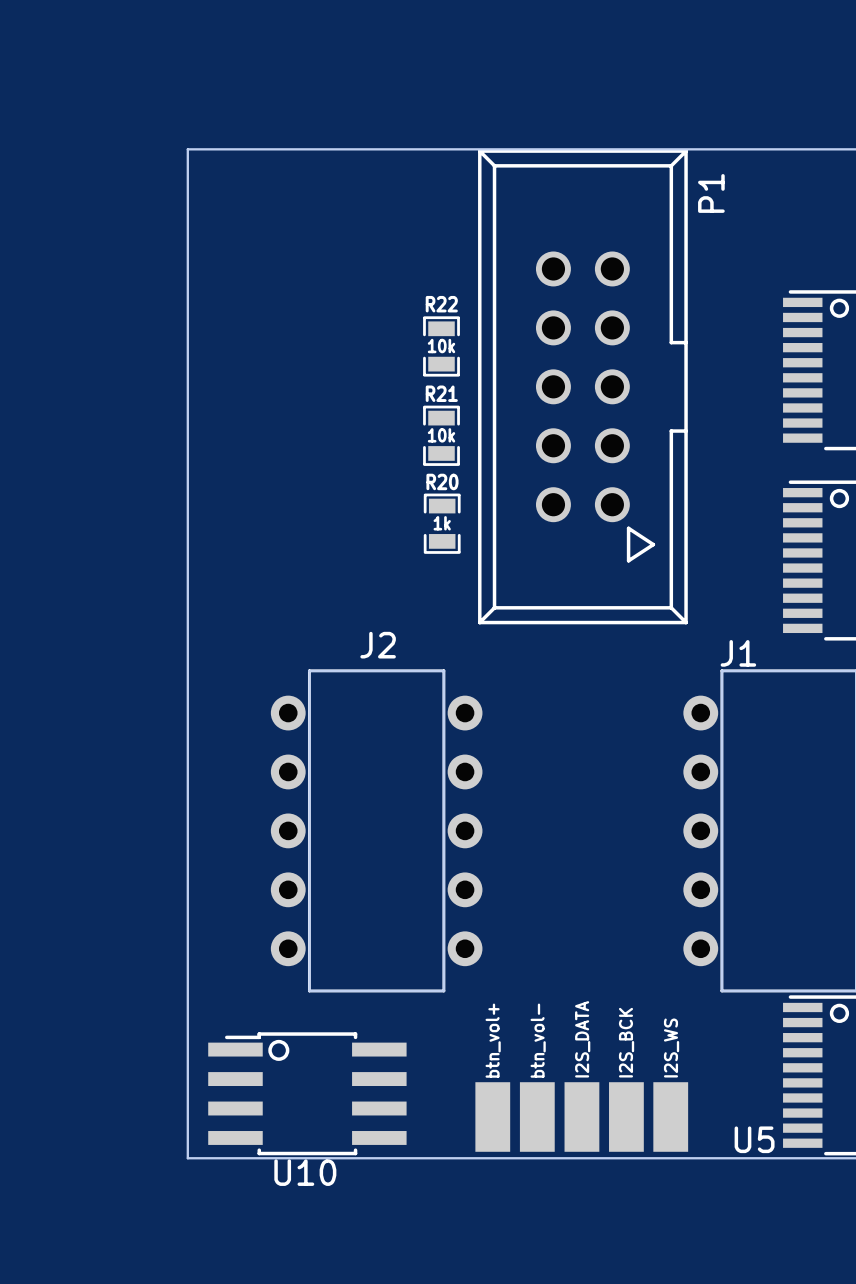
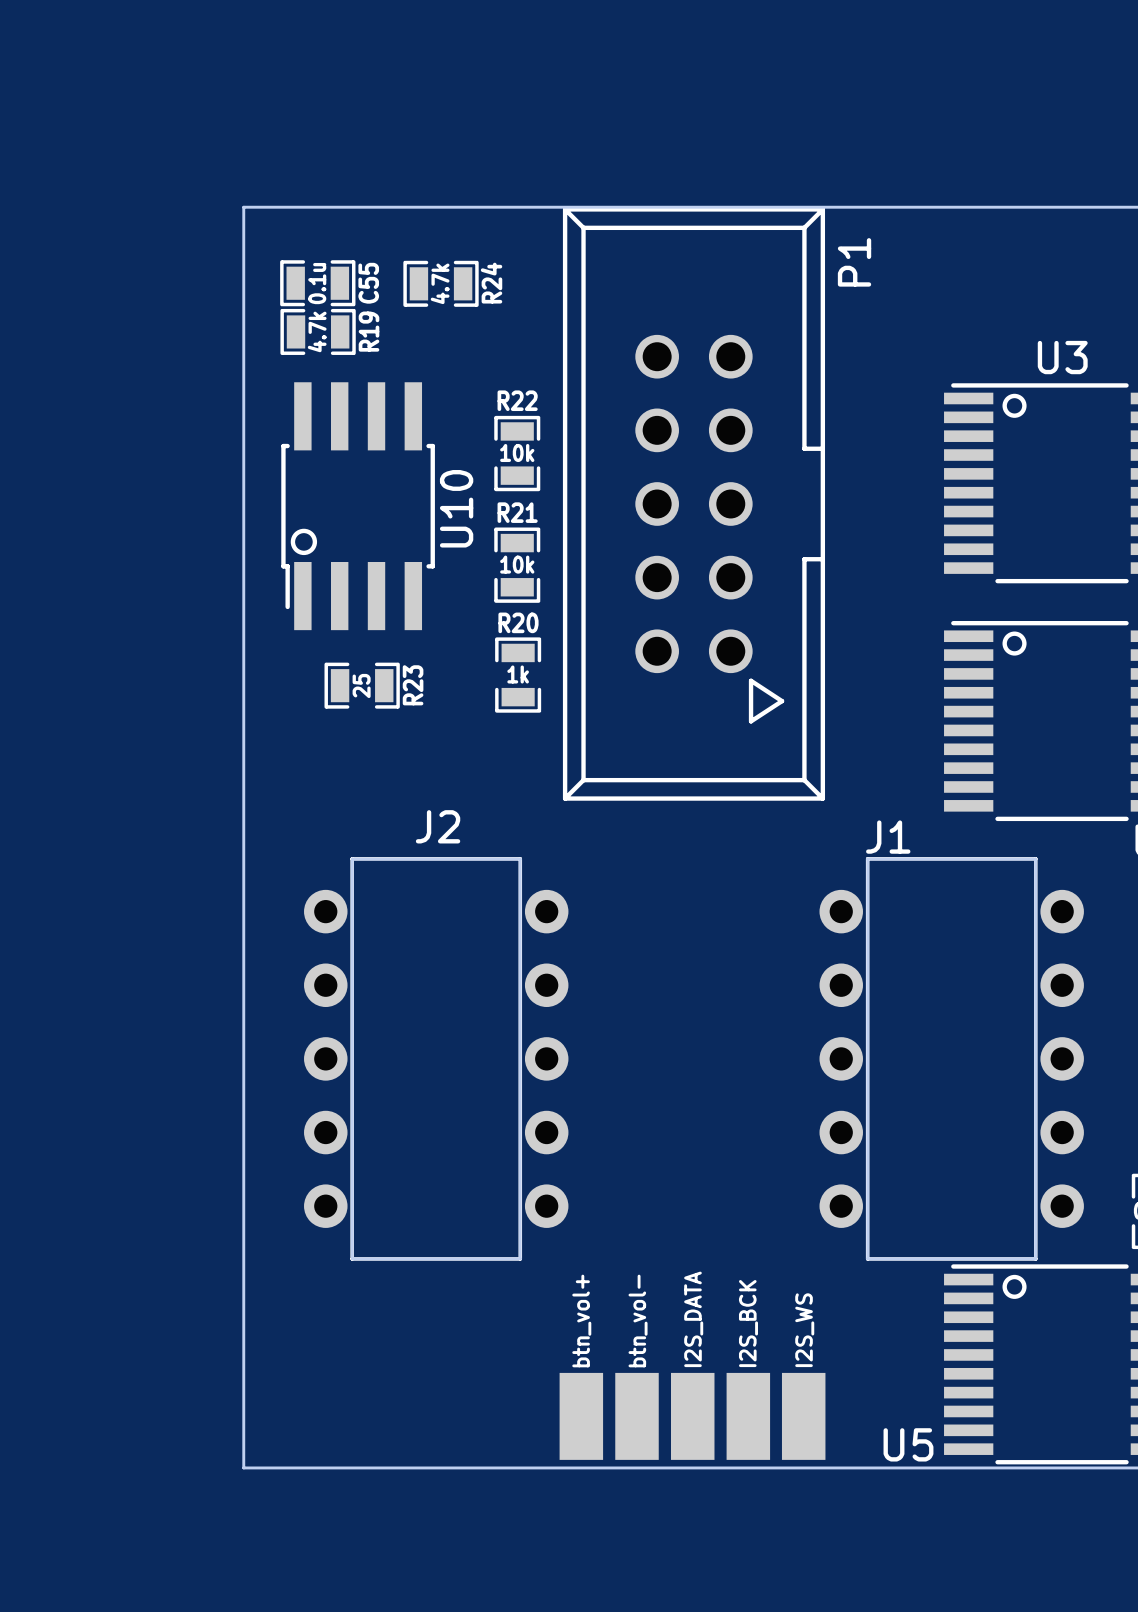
board edge: (222, 149) (187, 149) (187, 1158) (222, 1158) -> (243, 207) (243, 1467)
C55: none -> 0.1u (317, 283)
R24: none -> 4.7k (441, 283)
R19: none -> 4.7k (318, 331)
R23: none -> 25 (362, 685)
U10 rotation: 0° (307, 1093) -> 90° counterclockwise (358, 506)
U10 position: (307, 1093) -> (358, 506)

